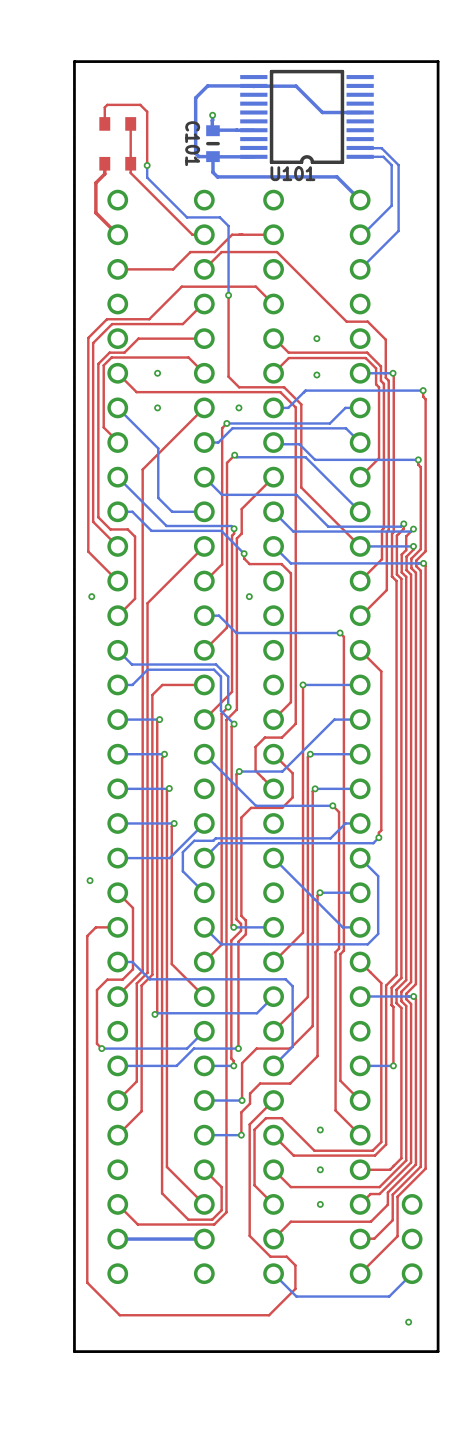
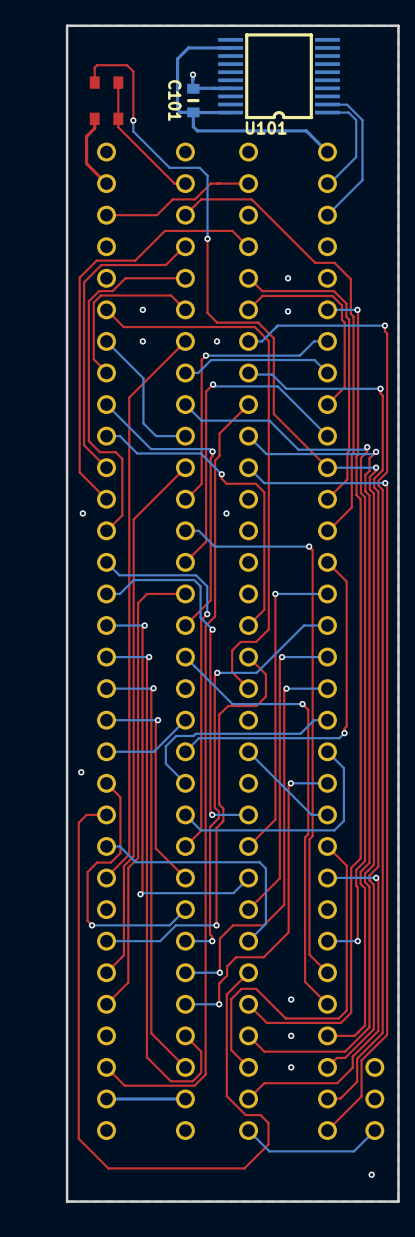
bottom track: (253, 86) (296, 86) (322, 112) (360, 112) -> none

